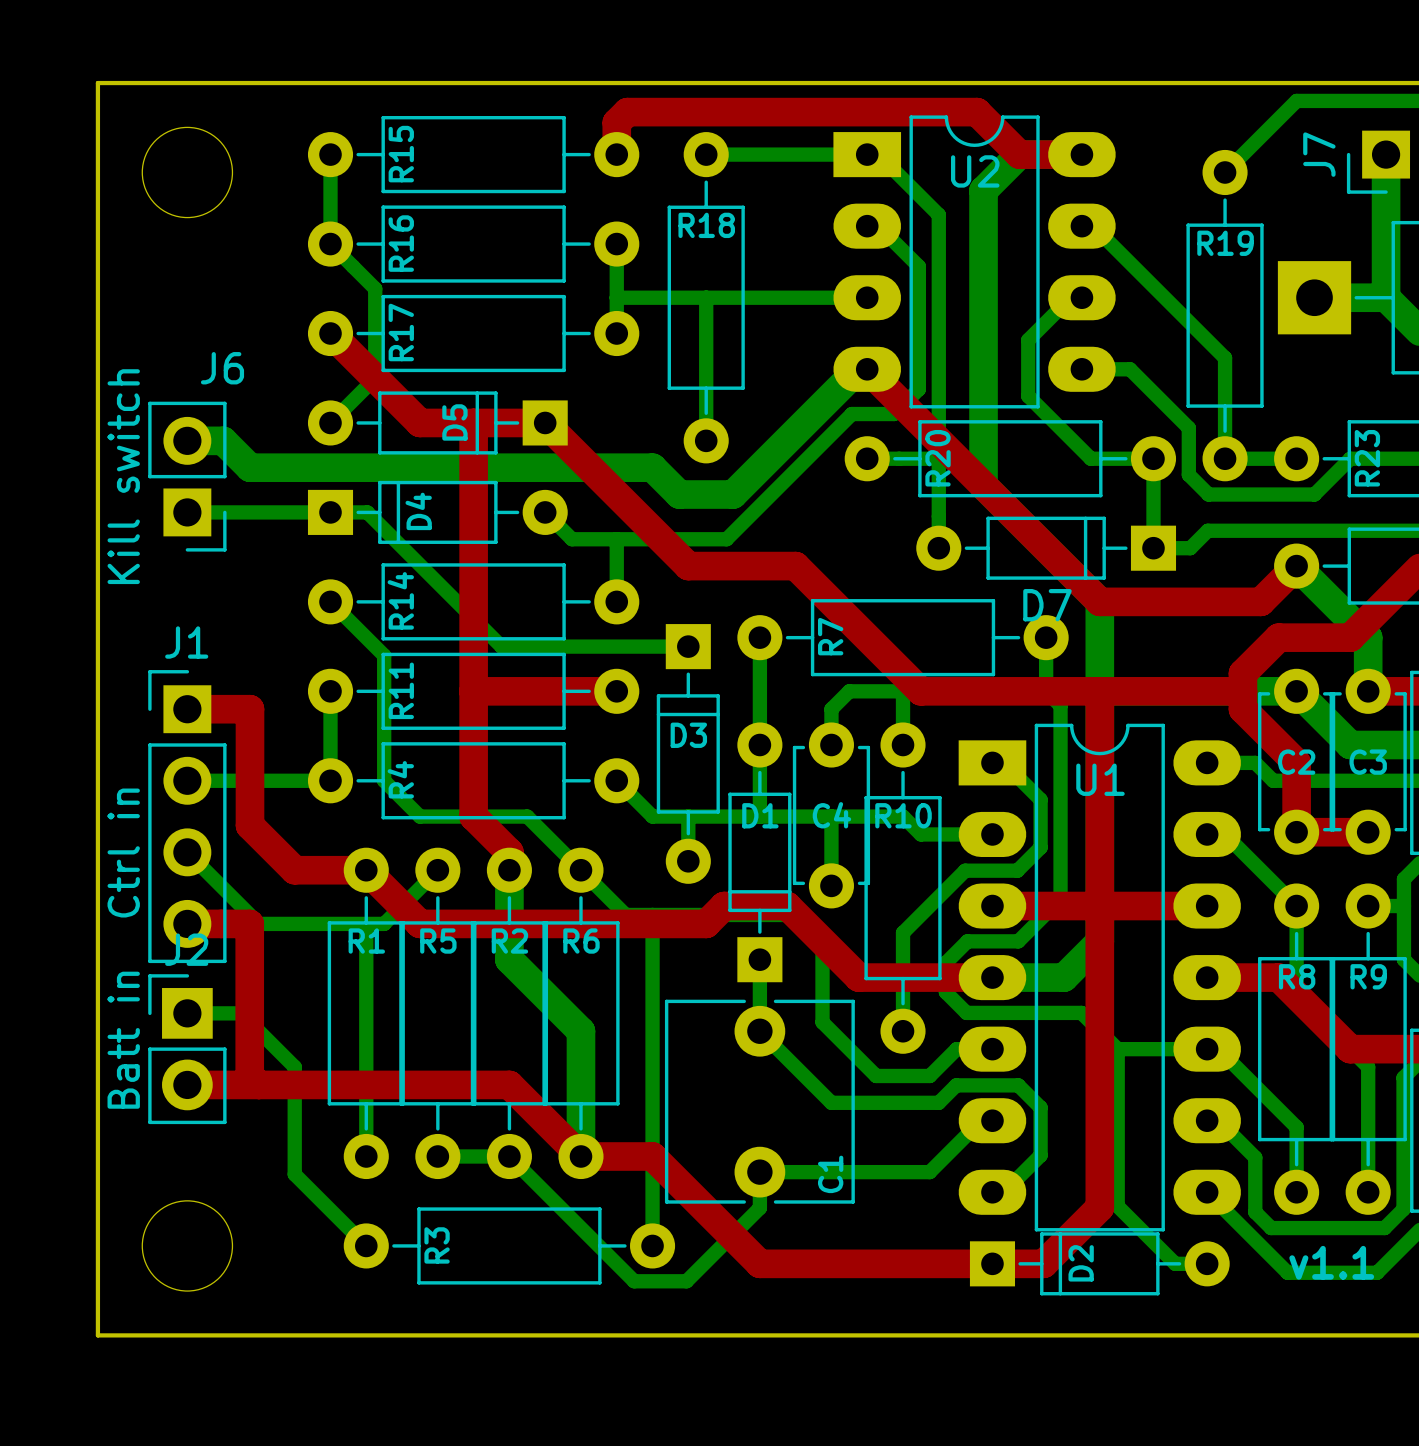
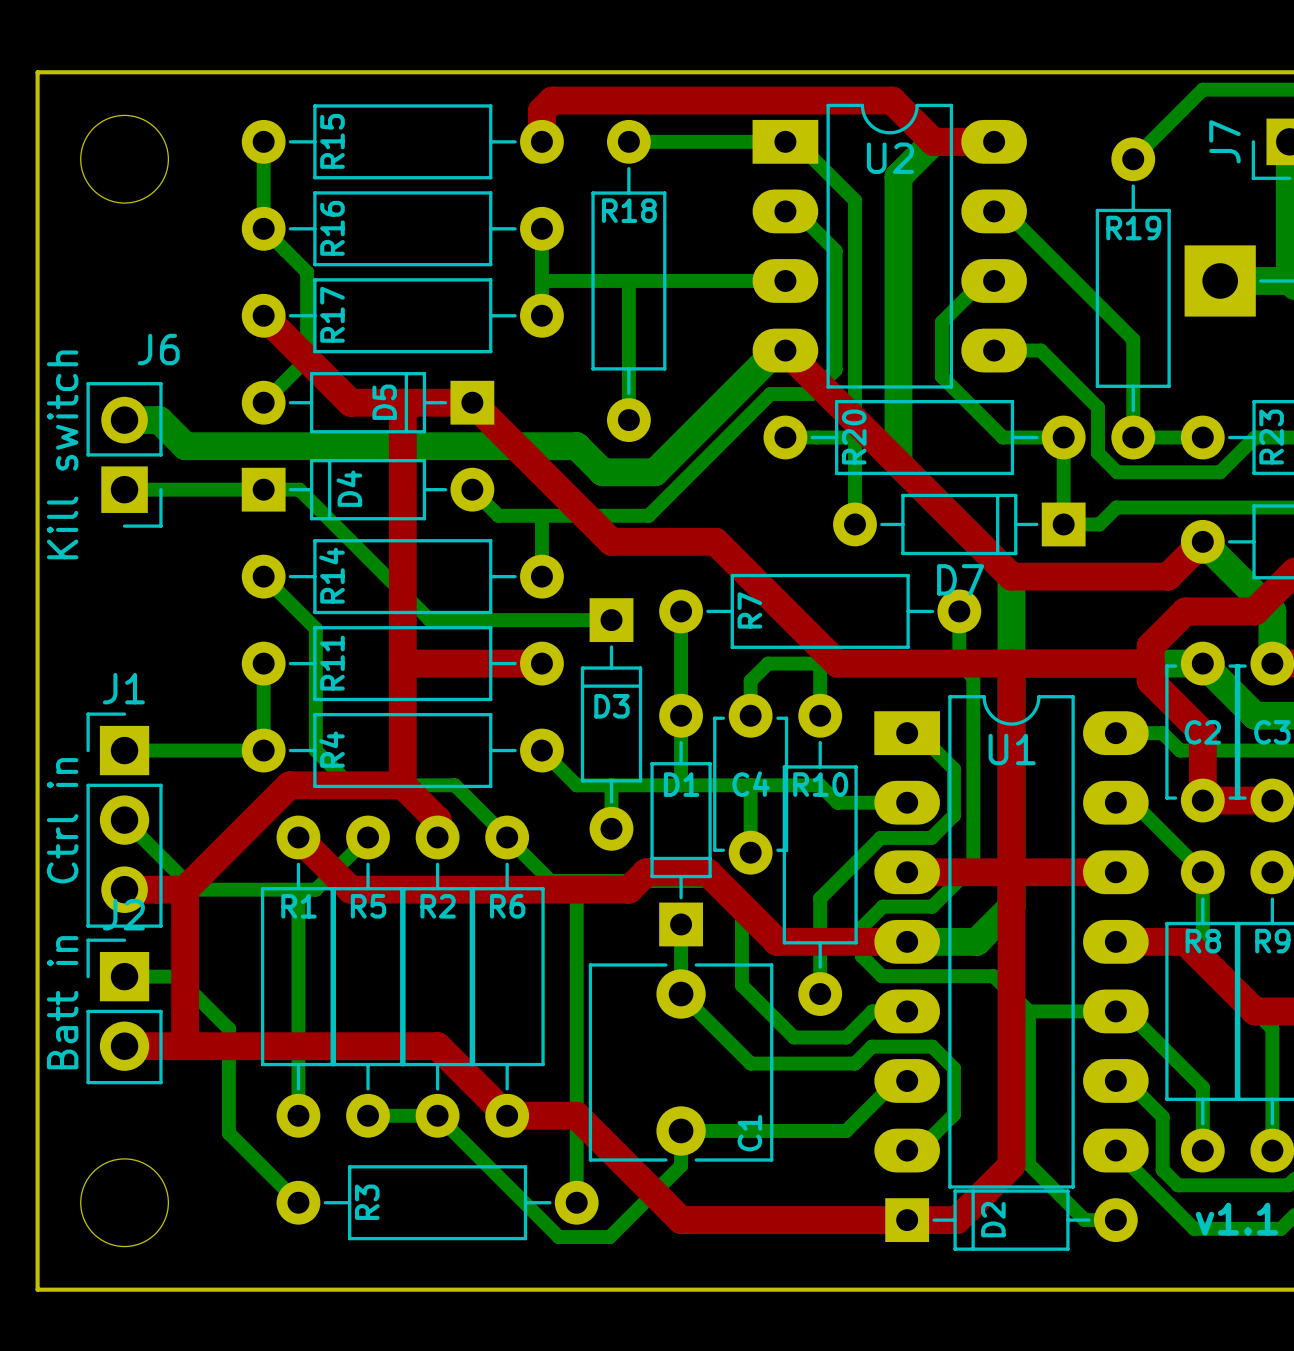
J1 footprint: [148, 670, 227, 964] -> [86, 712, 163, 928]
top track: (187, 709) (249, 709) (249, 825) (294, 870) (366, 870) -> none
top track: none -> (402, 785) (289, 785) (185, 889)
bottom track: (509, 870) (509, 959) (580, 1031) (580, 1156) -> none

